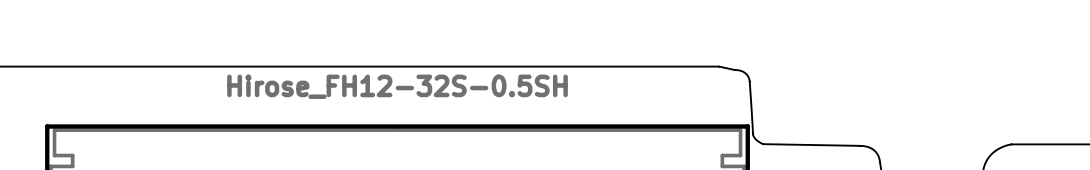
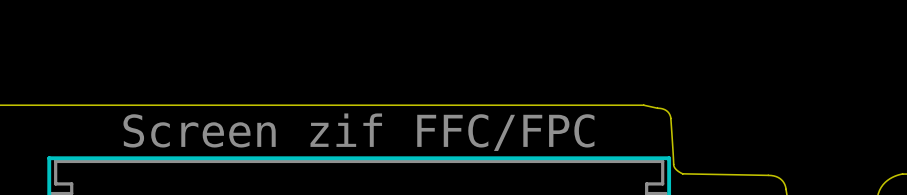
part value: Hirose_FH12-32S-0.5SH (397, 86) -> Screen zif FFC/FPC (358, 132)

